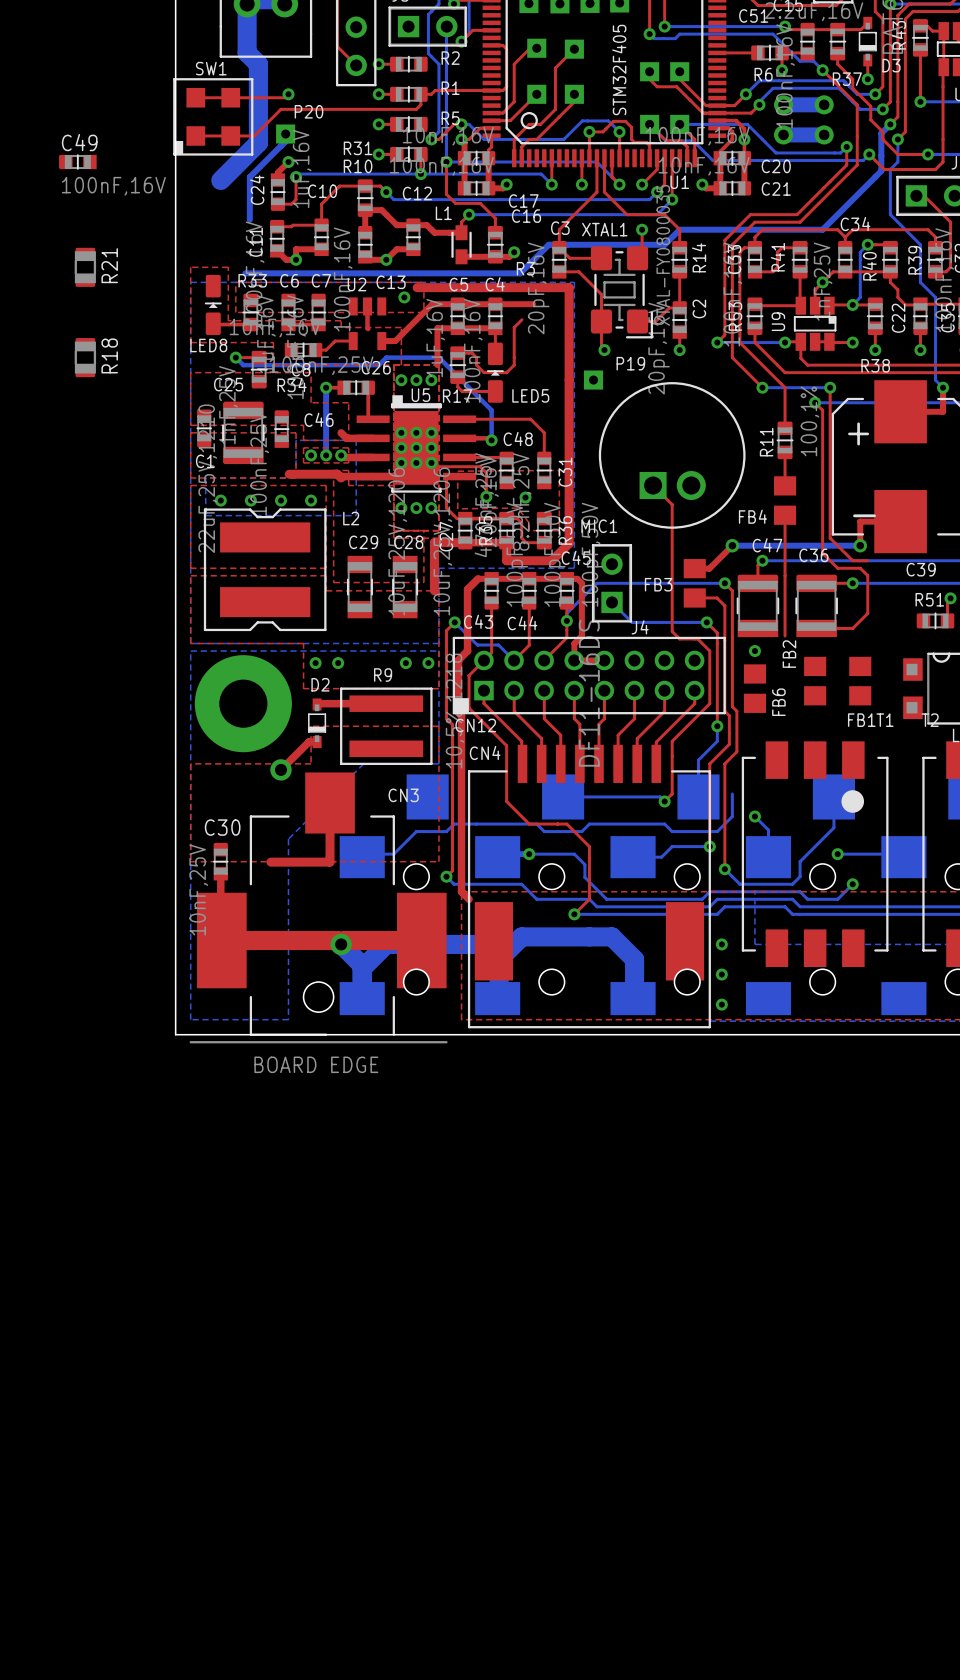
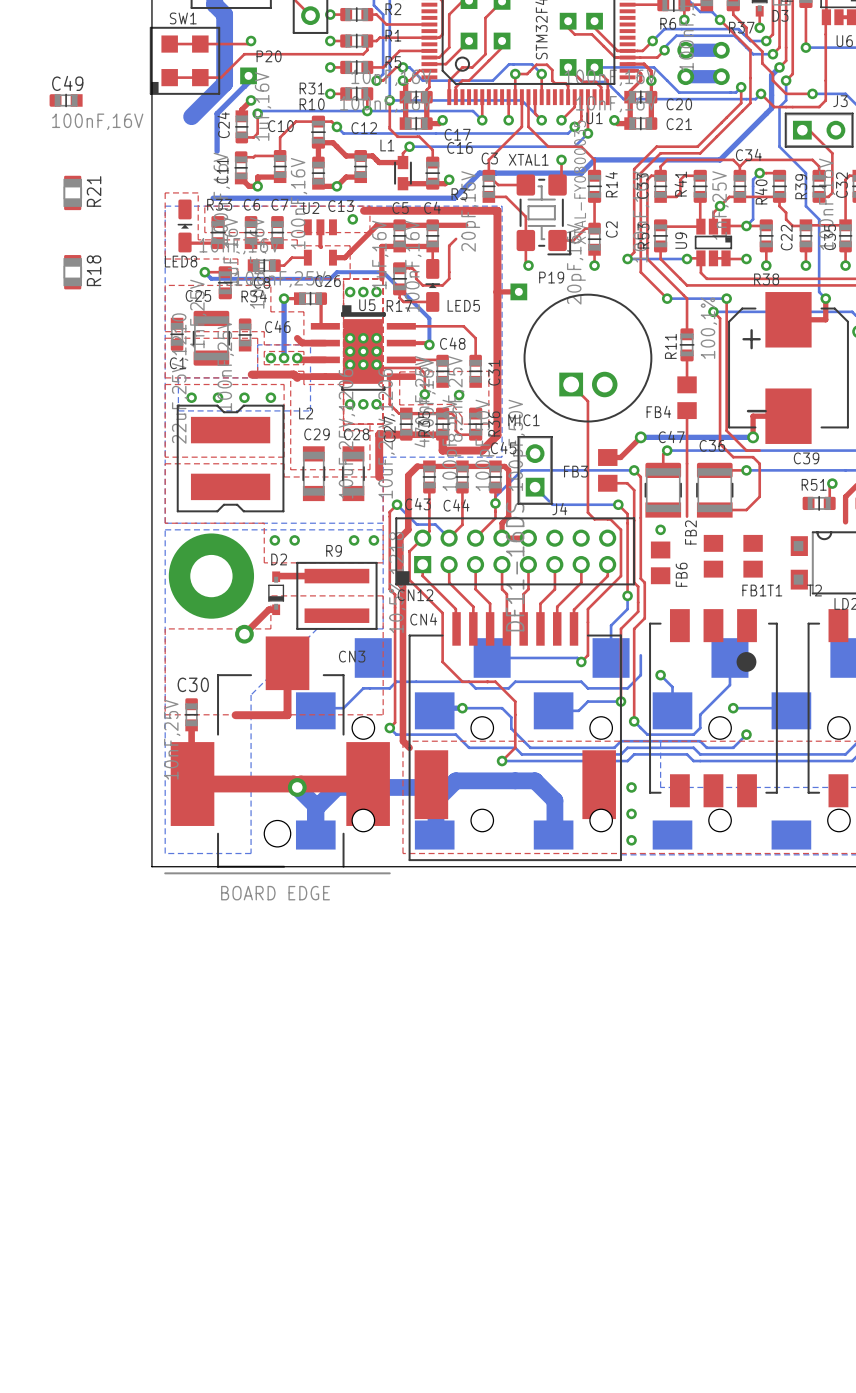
top track: none -> (367, 14) (376, 14) (386, 24) (429, 24)
top track: none -> (429, 50) (399, 50) (383, 67) (367, 67)
top track: none -> (497, 291) (518, 291)

